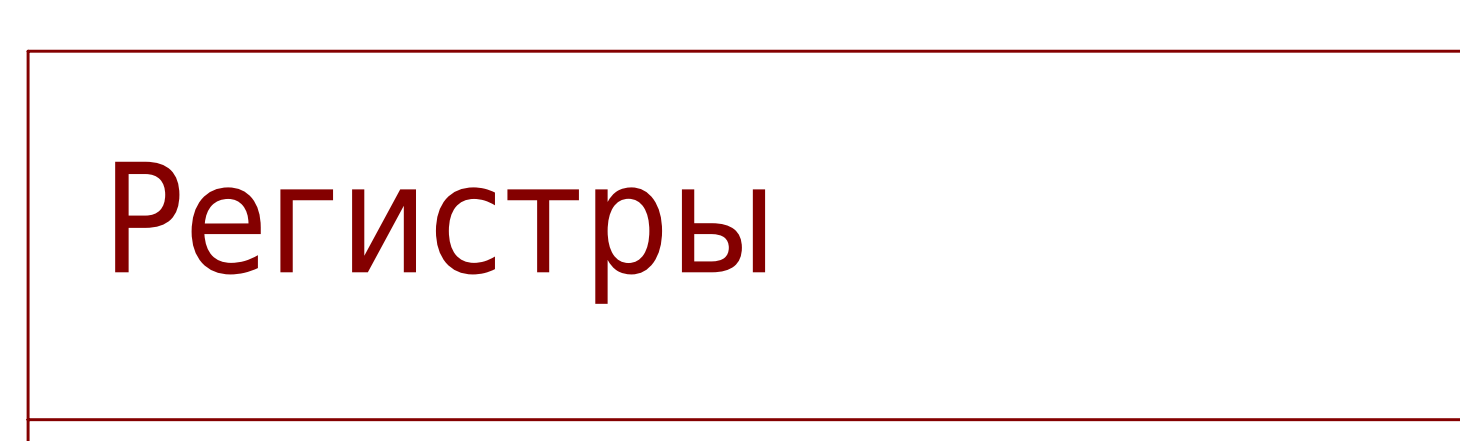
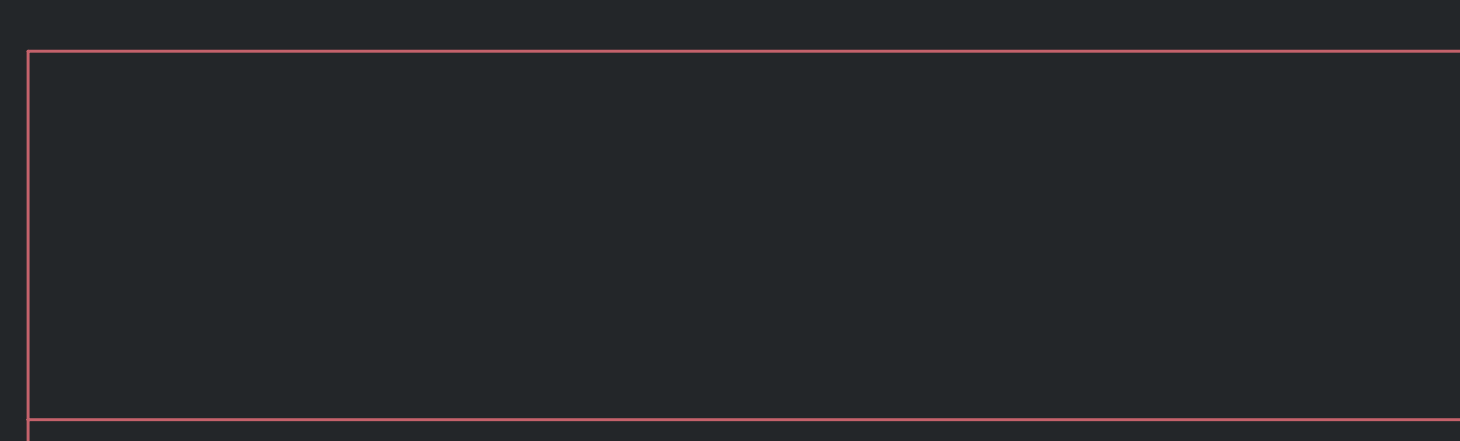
text: Регистры (440, 232) -> none

